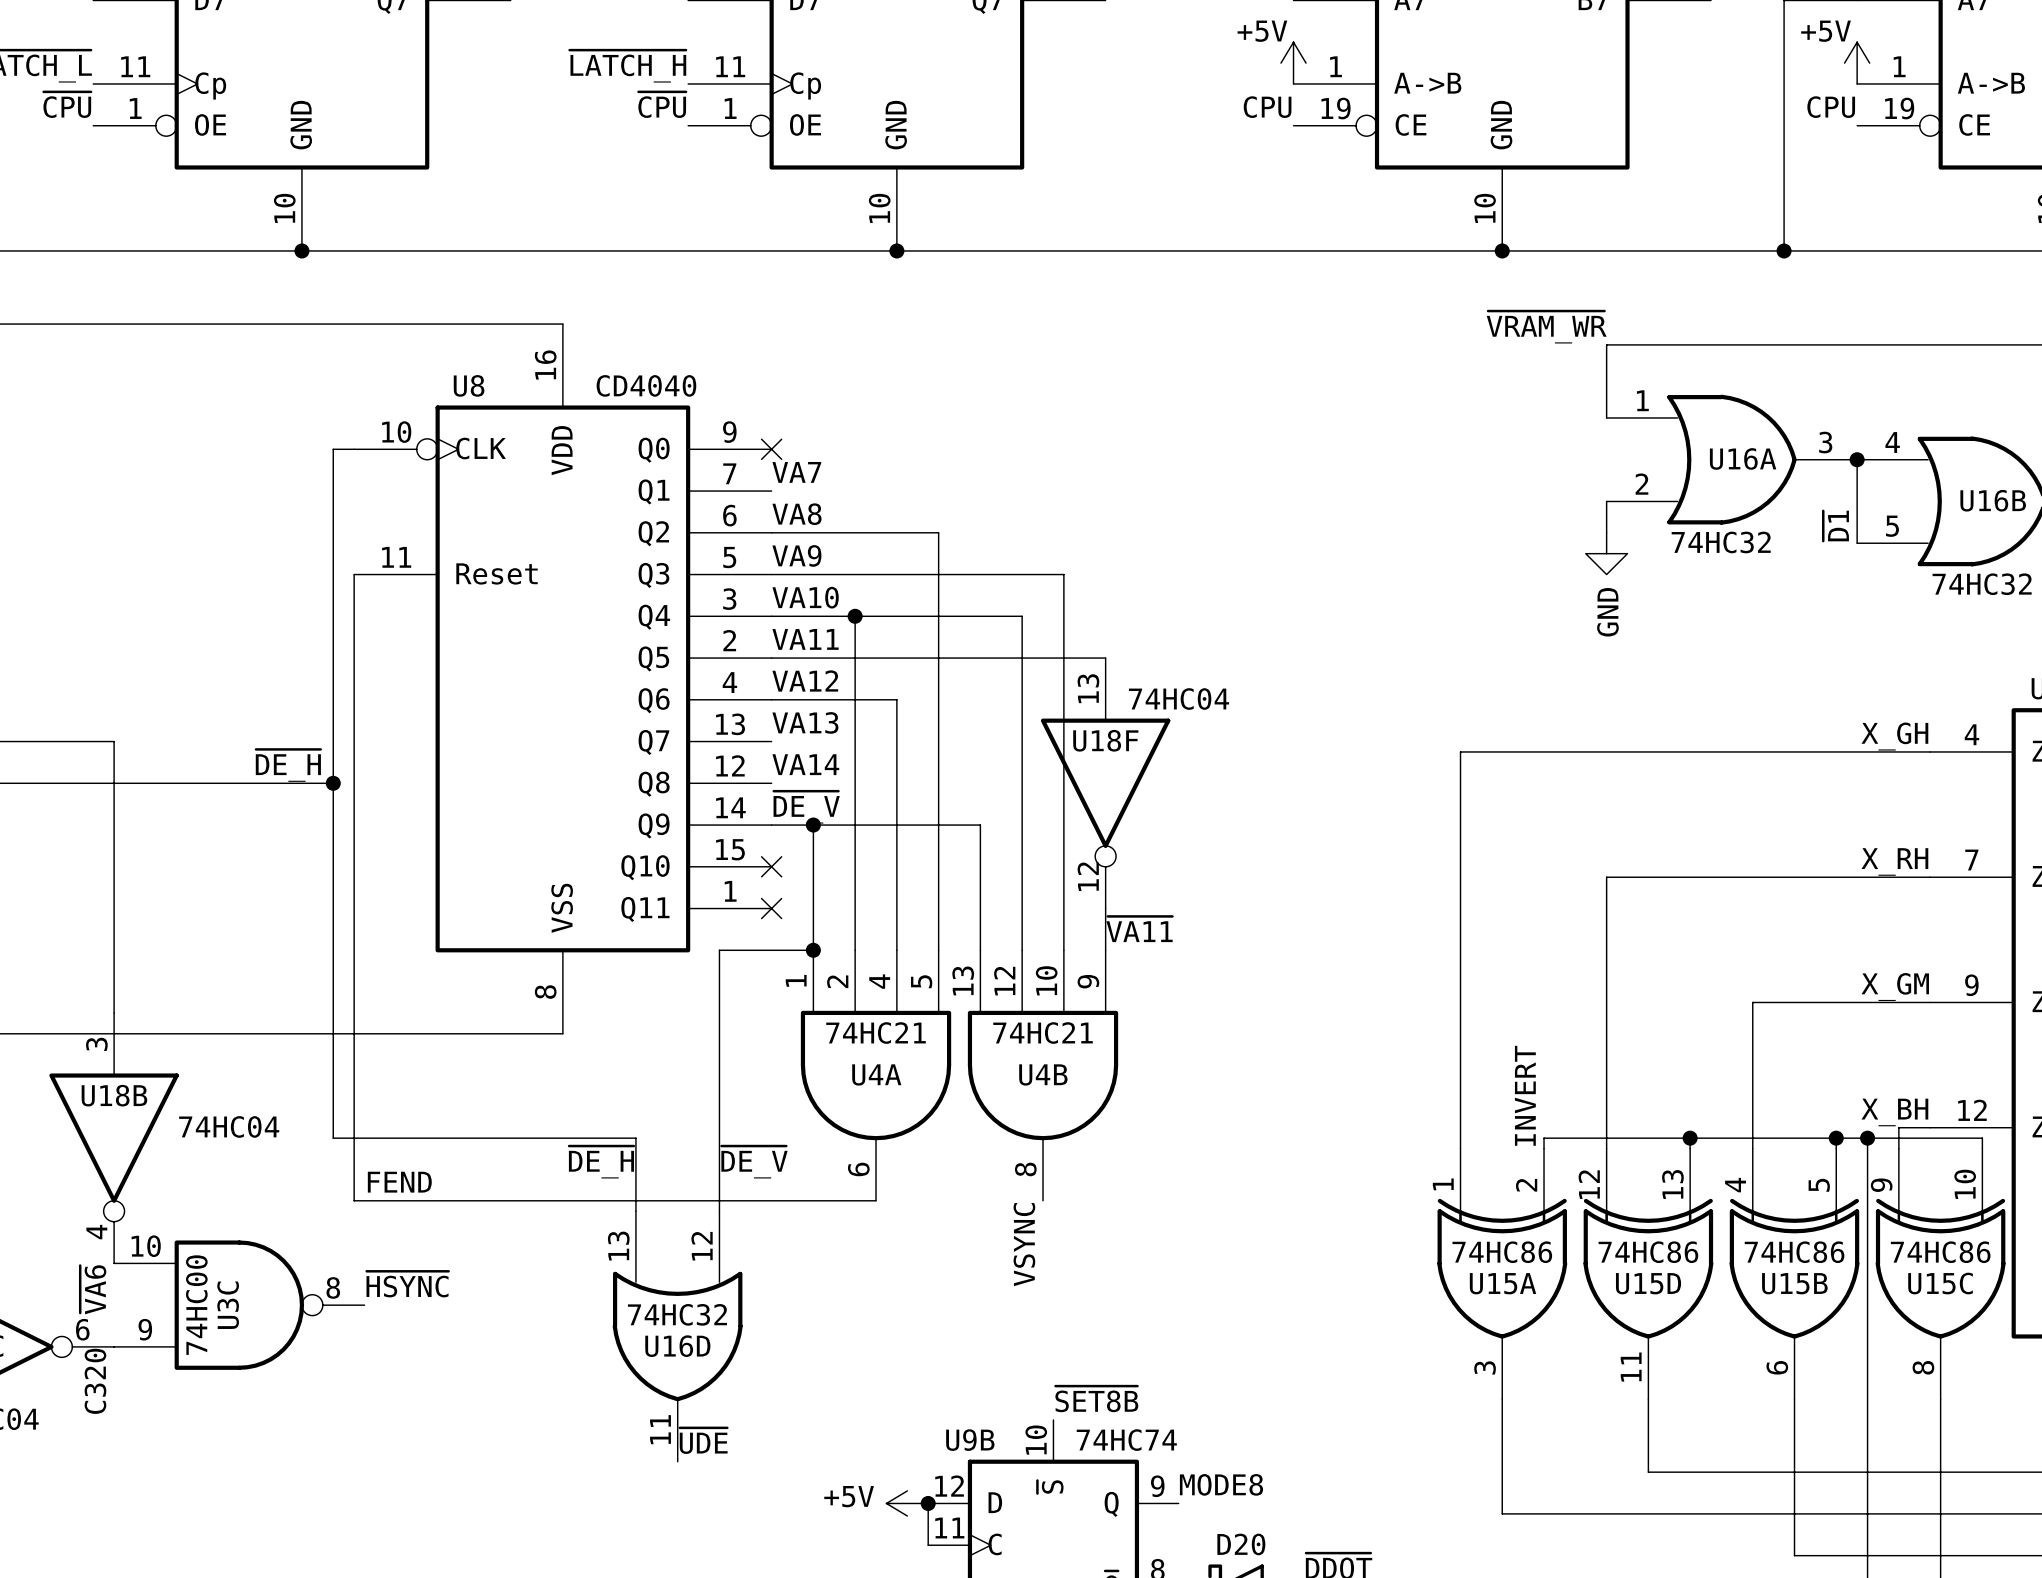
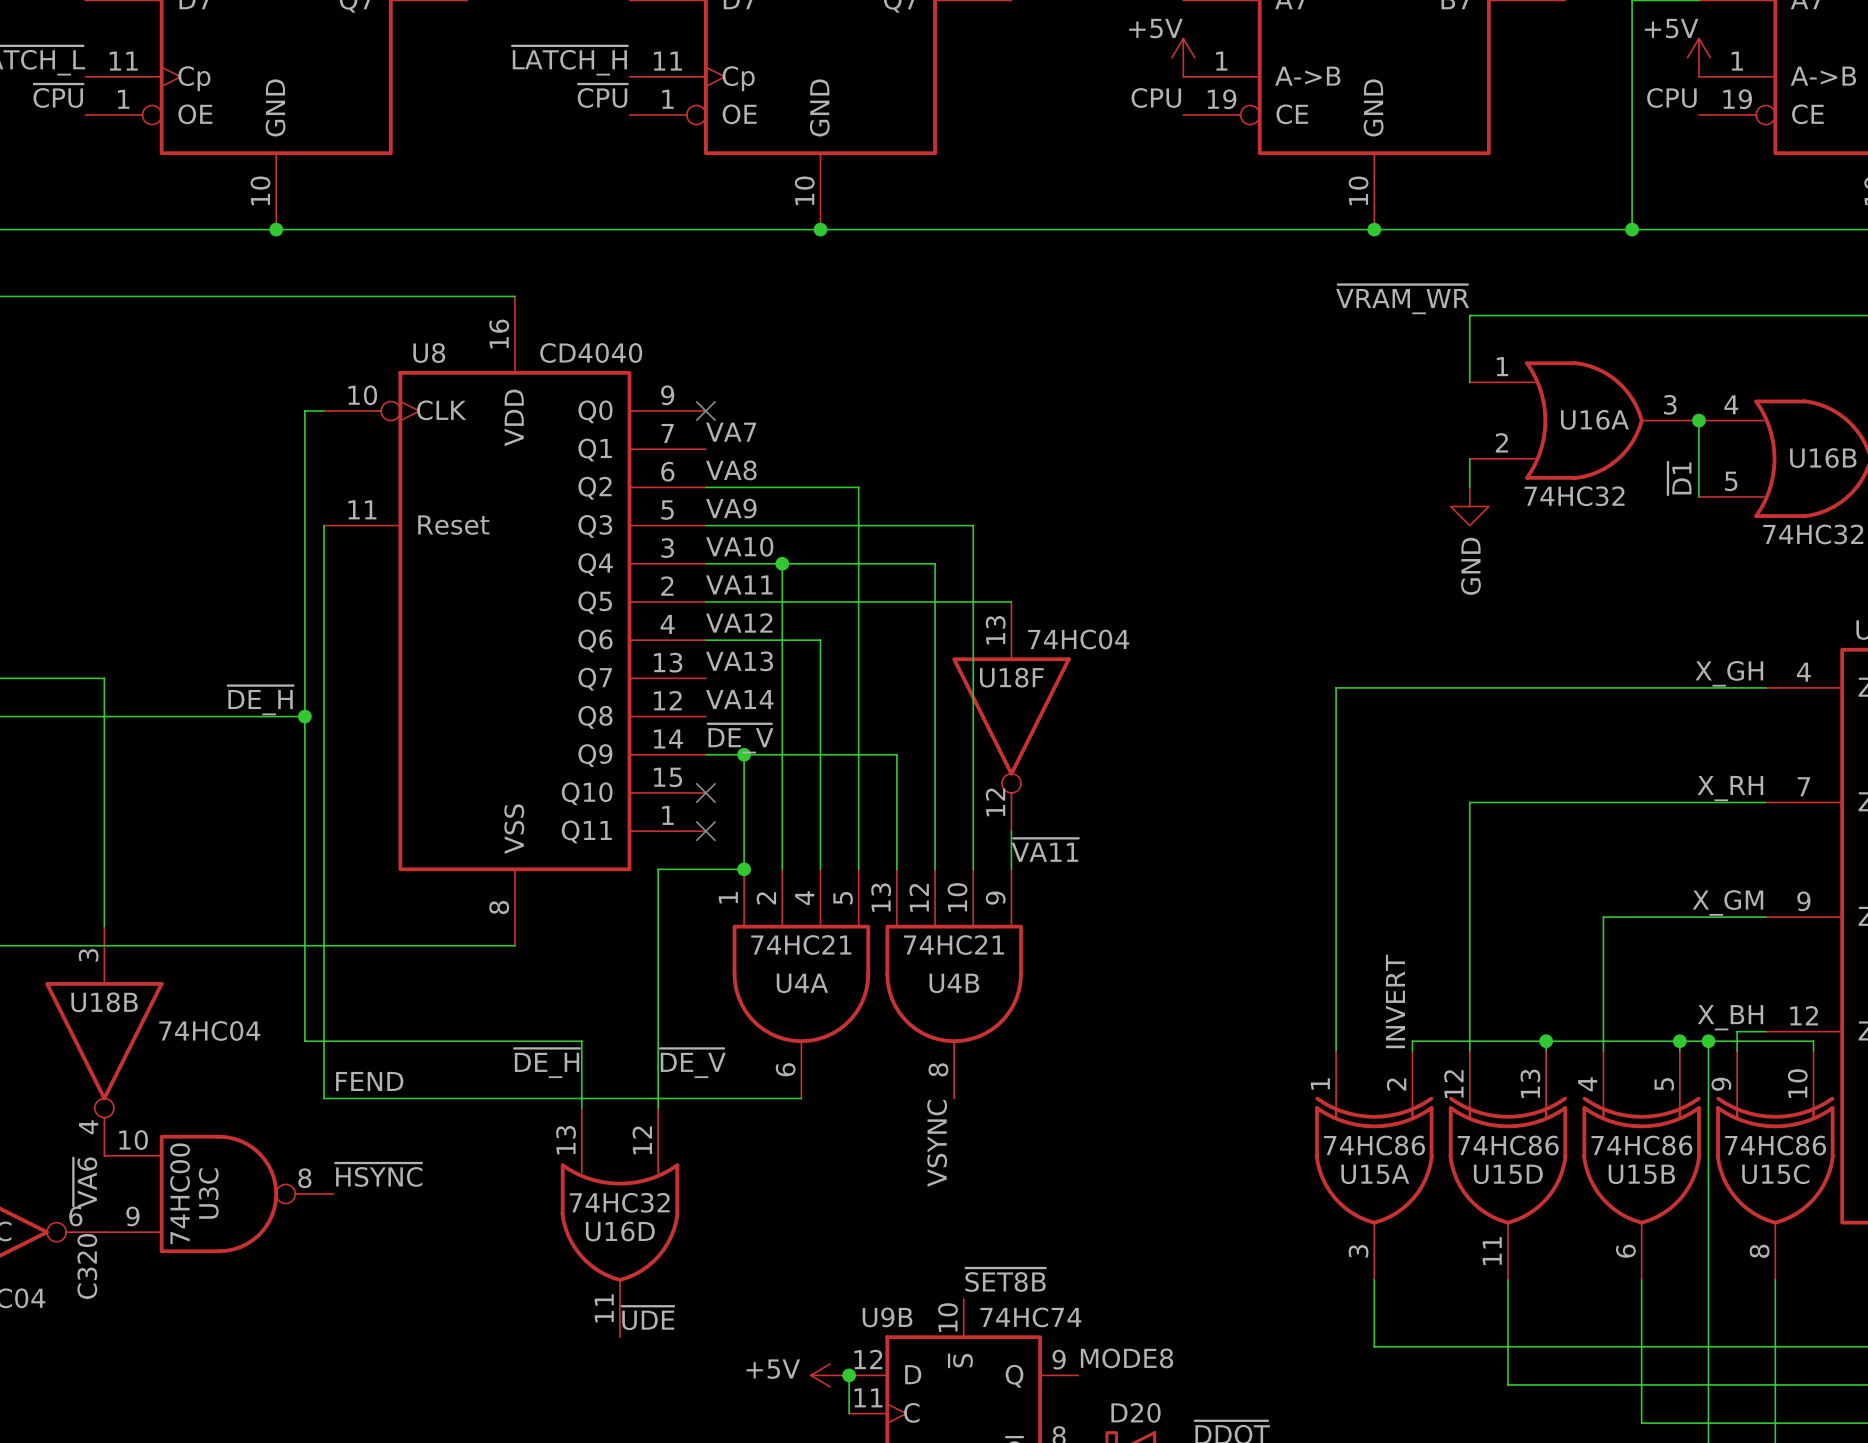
wire: (1502, 1472) (1502, 1513) (1648, 1513) -> (1374, 1346) (1507, 1346) (1507, 1384)

